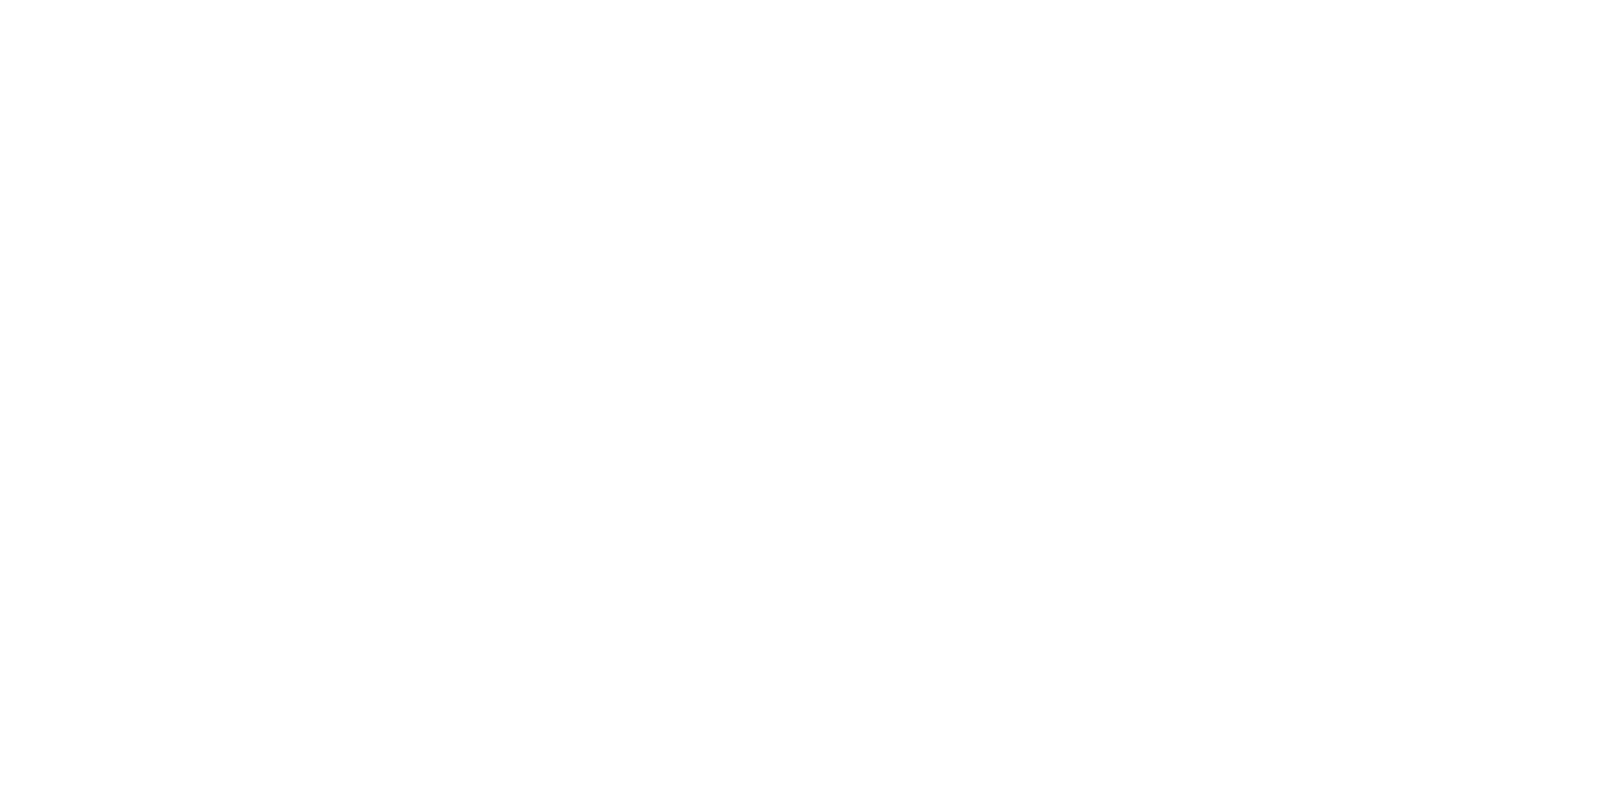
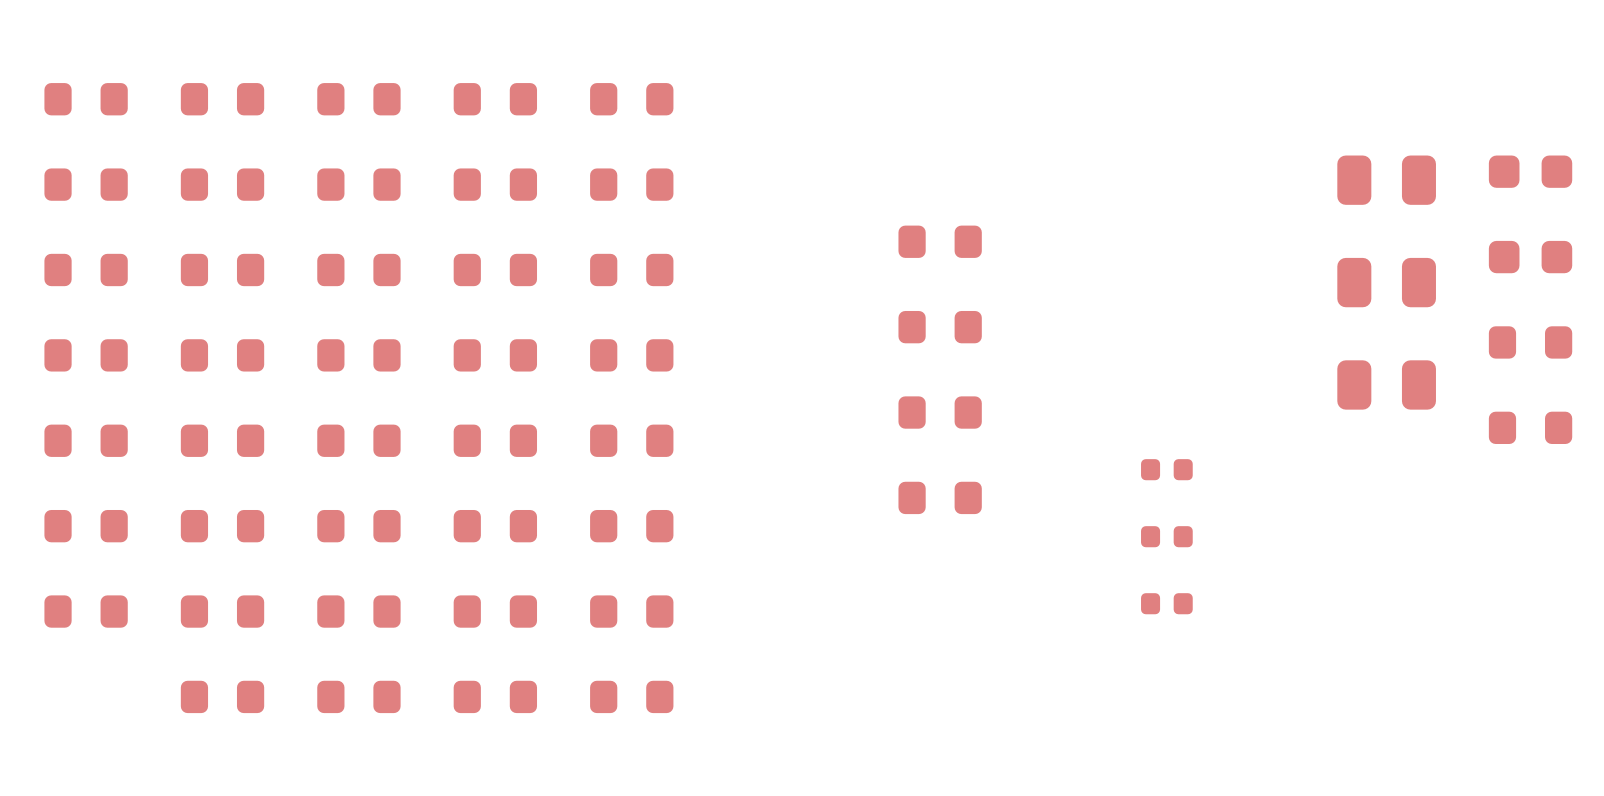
part: none -> (86, 99)
part: none -> (222, 99)
part: none -> (358, 99)
part: none -> (495, 99)
part: none -> (631, 99)
part: none -> (1530, 171)
part: none -> (1386, 180)
part: none -> (86, 184)
part: none -> (222, 184)
part: none -> (358, 184)
part: none -> (495, 184)
part: none -> (631, 184)
part: none -> (940, 241)
part: none -> (1530, 257)
part: none -> (86, 269)
part: none -> (222, 269)
part: none -> (358, 269)
part: none -> (495, 269)
part: none -> (631, 269)
part: none -> (1386, 282)
part: none -> (940, 327)
part: none -> (1530, 342)
part: none -> (86, 355)
part: none -> (222, 355)
part: none -> (358, 355)
part: none -> (495, 355)
part: none -> (631, 355)
part: none -> (1386, 384)
part: none -> (940, 412)
part: none -> (1530, 427)
part: none -> (86, 440)
part: none -> (222, 440)
part: none -> (358, 440)
part: none -> (495, 440)
part: none -> (631, 440)
part: none -> (1166, 469)
part: none -> (940, 497)
part: none -> (86, 526)
part: none -> (222, 526)
part: none -> (358, 526)
part: none -> (495, 526)
part: none -> (631, 526)
part: none -> (1166, 536)
part: none -> (1166, 603)
part: none -> (86, 611)
part: none -> (222, 611)
part: none -> (358, 611)
part: none -> (495, 611)
part: none -> (631, 611)
part: none -> (222, 696)
part: none -> (358, 696)
part: none -> (495, 696)
part: none -> (631, 696)

